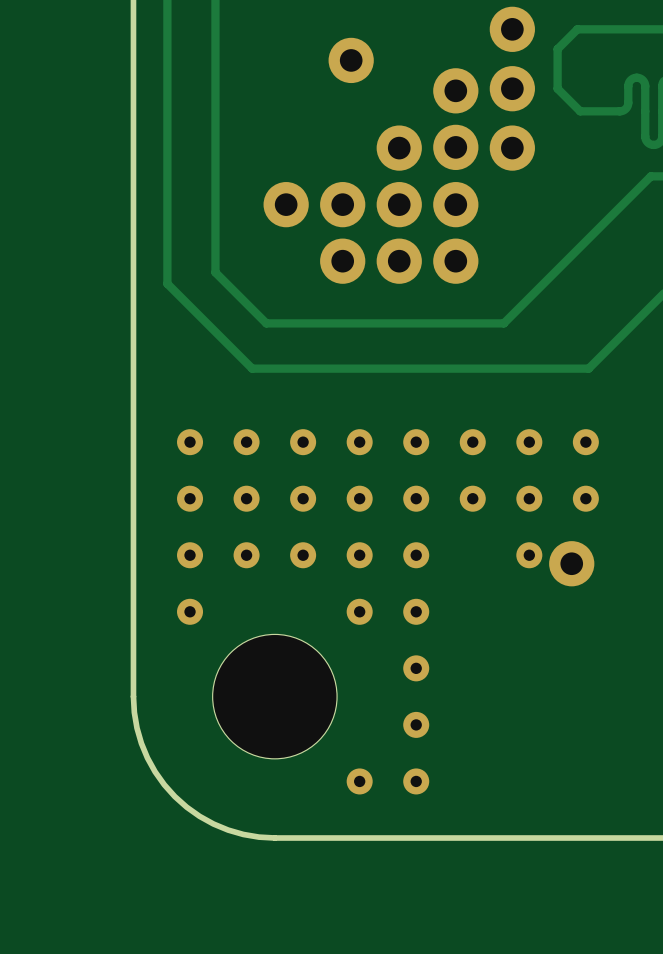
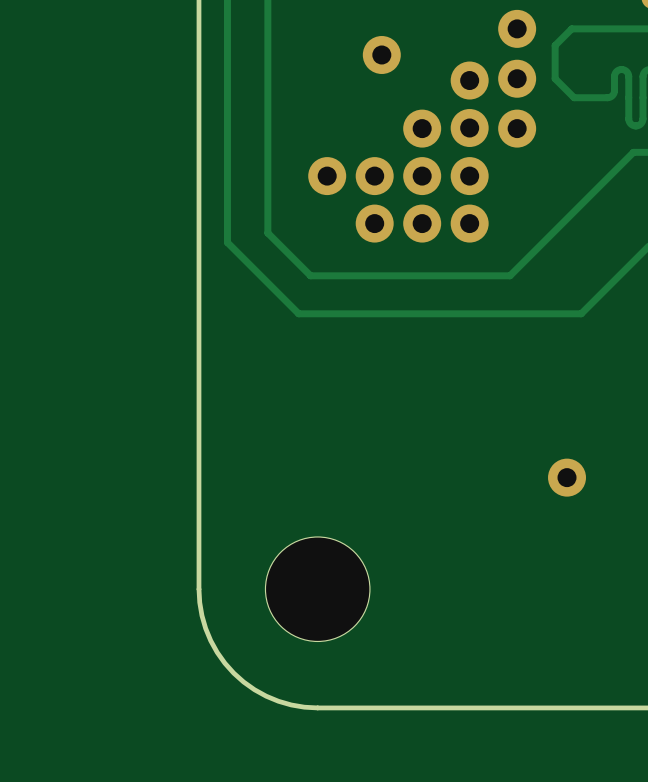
via: (190, 442) -> none
via: (246, 442) -> none
via: (303, 442) -> none
via: (359, 442) -> none
via: (416, 442) -> none
via: (472, 442) -> none
via: (529, 442) -> none
via: (585, 442) -> none
via: (190, 498) -> none
via: (246, 498) -> none
via: (303, 498) -> none
via: (359, 498) -> none
via: (416, 498) -> none
via: (472, 498) -> none
via: (529, 498) -> none
via: (585, 498) -> none
via: (190, 555) -> none
via: (246, 555) -> none
via: (303, 555) -> none
via: (359, 555) -> none
via: (416, 555) -> none
via: (529, 555) -> none
via: (190, 611) -> none
via: (359, 611) -> none
via: (416, 611) -> none
via: (416, 668) -> none
via: (416, 724) -> none
via: (359, 781) -> none
via: (416, 781) -> none

